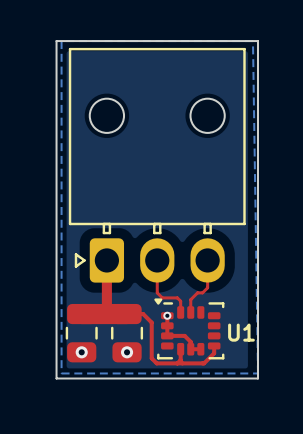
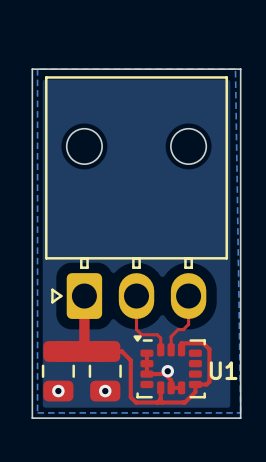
top track: none -> (181, 349) (181, 343) (203, 343) (209, 349) (209, 381) (206, 384) (195, 384)
via: (167, 315) -> none
via: none -> (167, 371)

